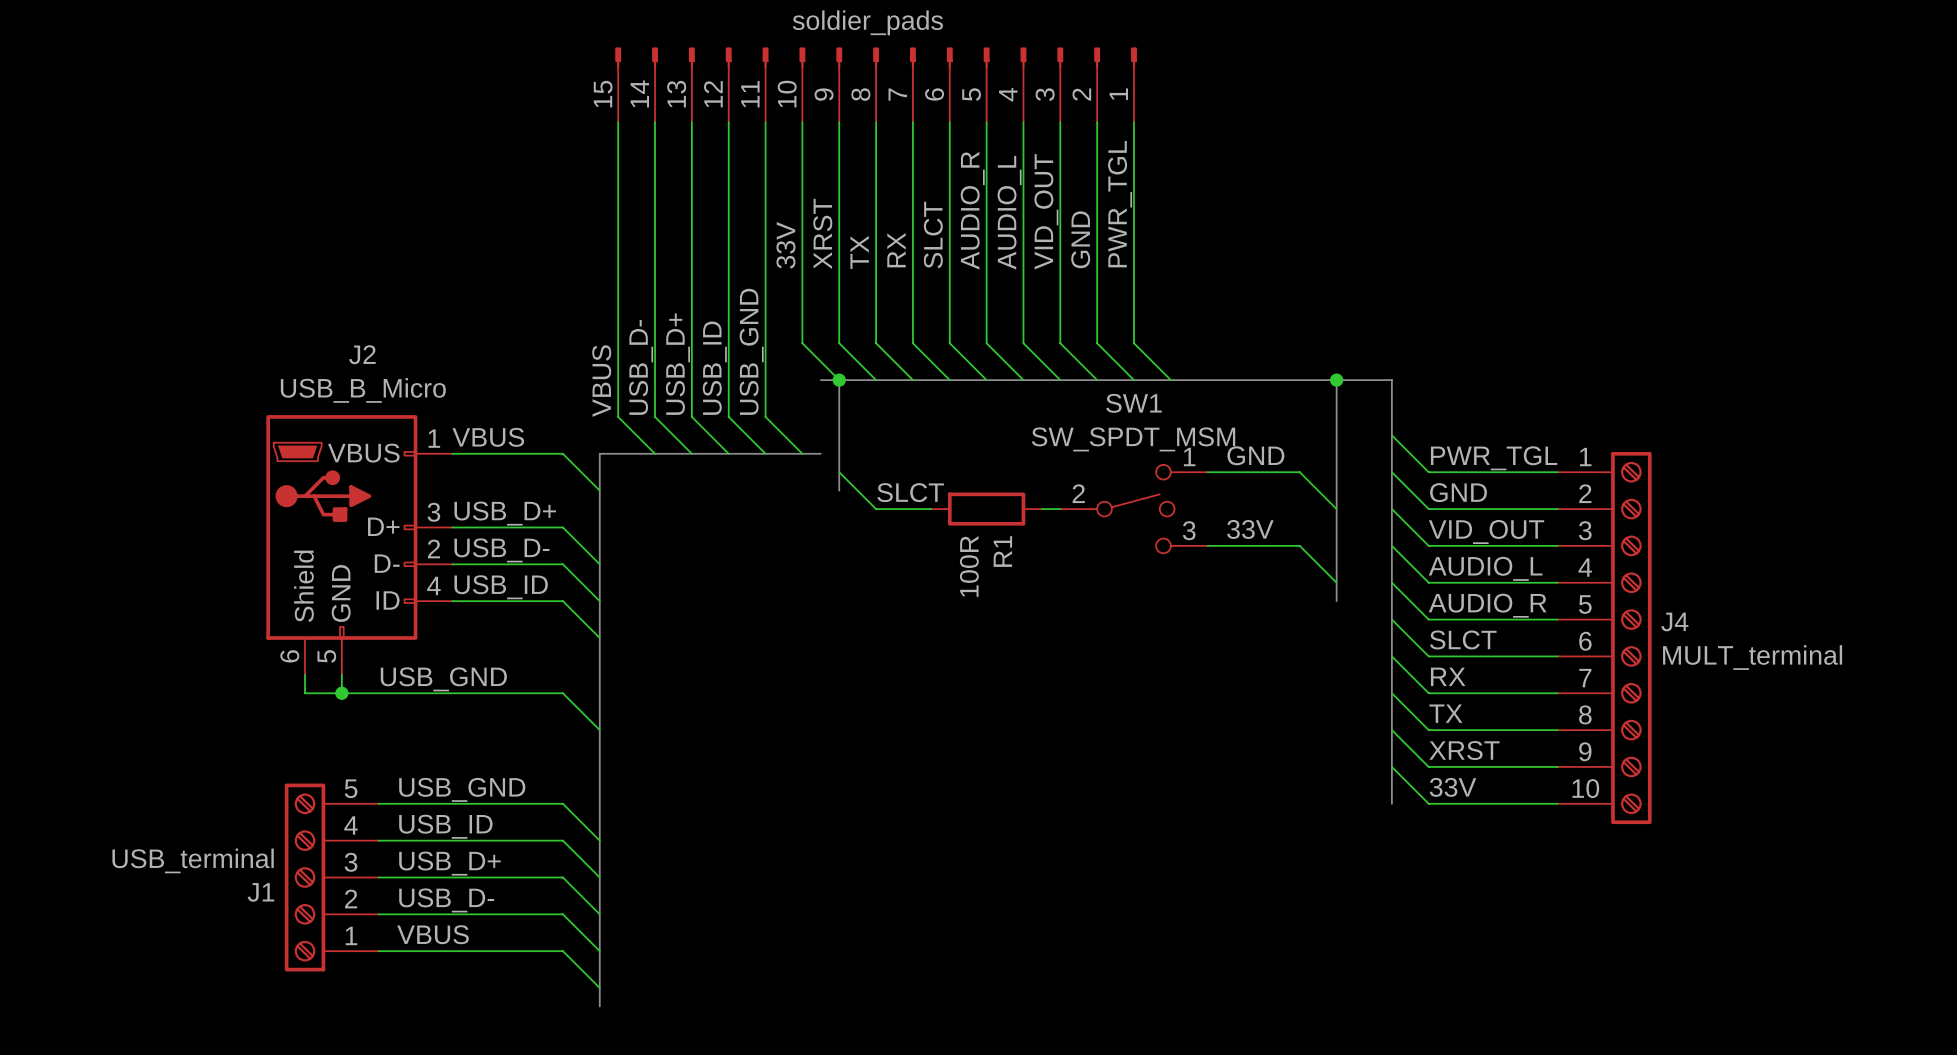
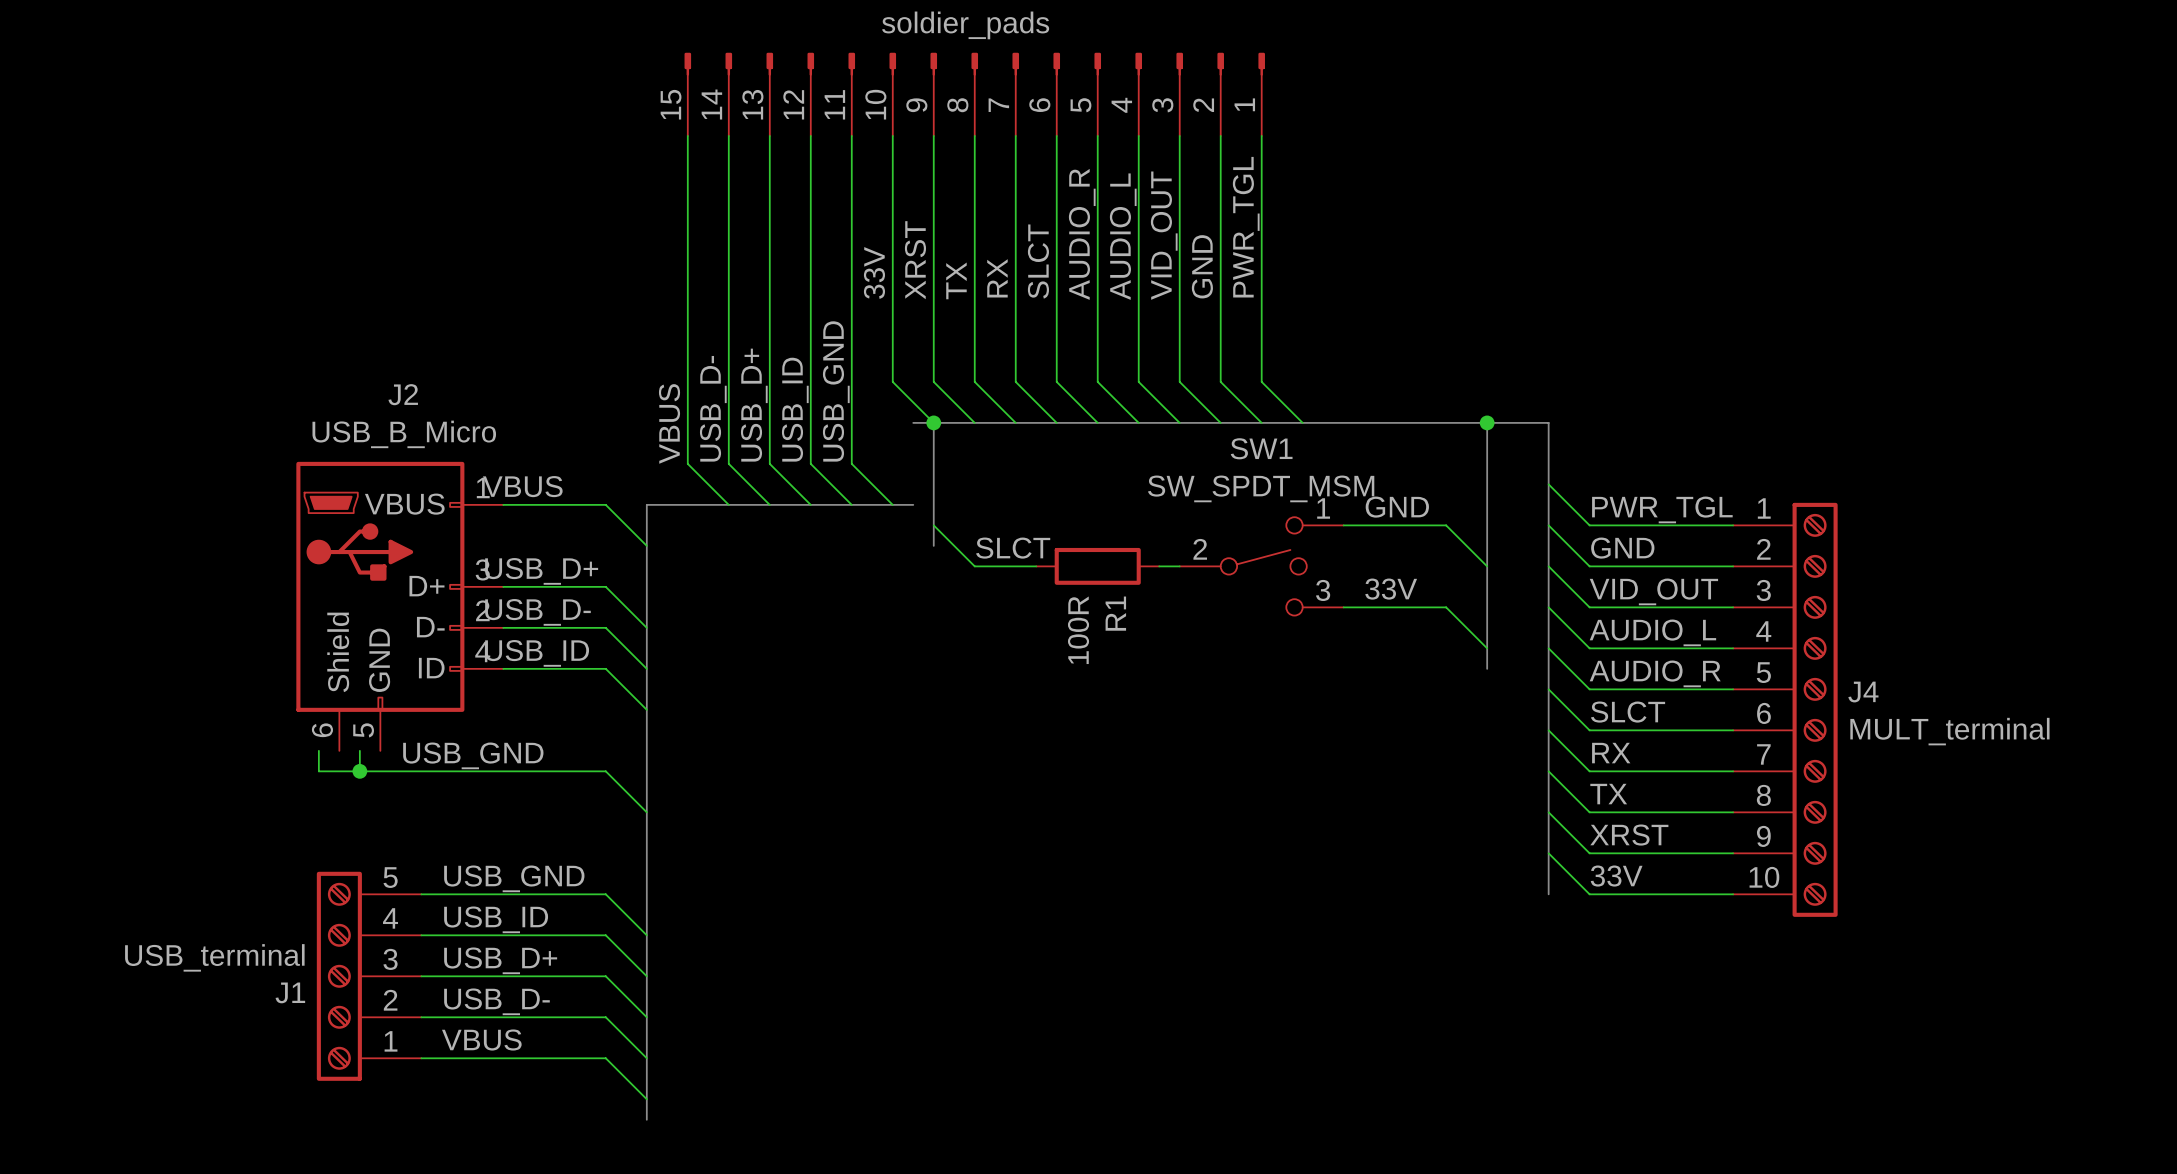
label position: VBUS (488, 437) -> VBUS (522, 486)
wire: (544, 453) (562, 453) (599, 490) -> (605, 504) (646, 545)
bus: (599, 453) (599, 1006) -> (667, 504) (646, 504) (646, 1119)
label position: USB_D+ (505, 513) -> USB_D+ (541, 571)
wire: (544, 527) (562, 527) (599, 564) -> (605, 586) (646, 627)
label position: USB_D- (501, 550) -> USB_D- (537, 612)
wire: (544, 564) (562, 564) (599, 601) -> (605, 627) (646, 668)
label position: USB_ID (501, 587) -> USB_ID (537, 653)
wire: (544, 601) (562, 601) (599, 638) -> (605, 668) (646, 709)
wire: (305, 674) (305, 693) -> (318, 750) (318, 771) (339, 771)
wire: (341, 674) (341, 693) -> (359, 750) (359, 771)
label position: USB_GND (443, 679) -> USB_GND (473, 755)
junction position: (341, 693) -> (359, 771)
wire: (544, 693) (562, 693) (599, 730) -> (605, 771) (646, 812)
wire: (544, 803) (562, 803) (599, 840) -> (605, 894) (646, 935)
wire: (544, 840) (562, 840) (599, 877) -> (605, 935) (646, 976)
wire: (544, 877) (562, 877) (599, 914) -> (605, 976) (646, 1017)
wire: (544, 914) (562, 914) (599, 951) -> (605, 1017) (646, 1058)
wire: (544, 951) (562, 951) (599, 988) -> (605, 1058) (646, 1099)

